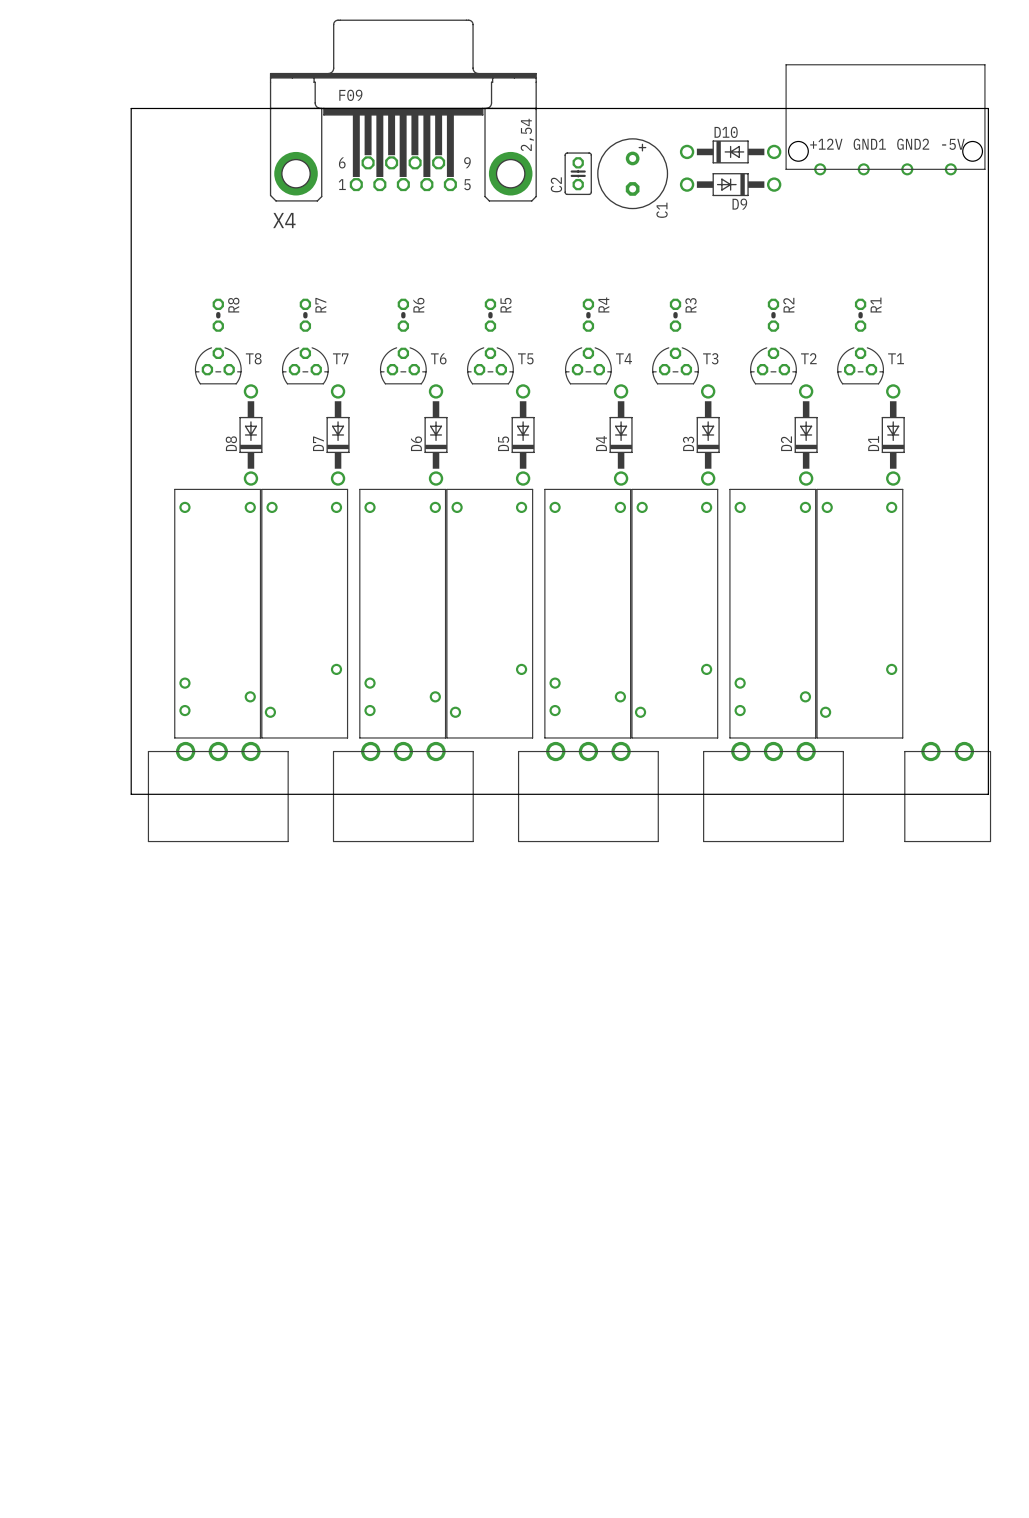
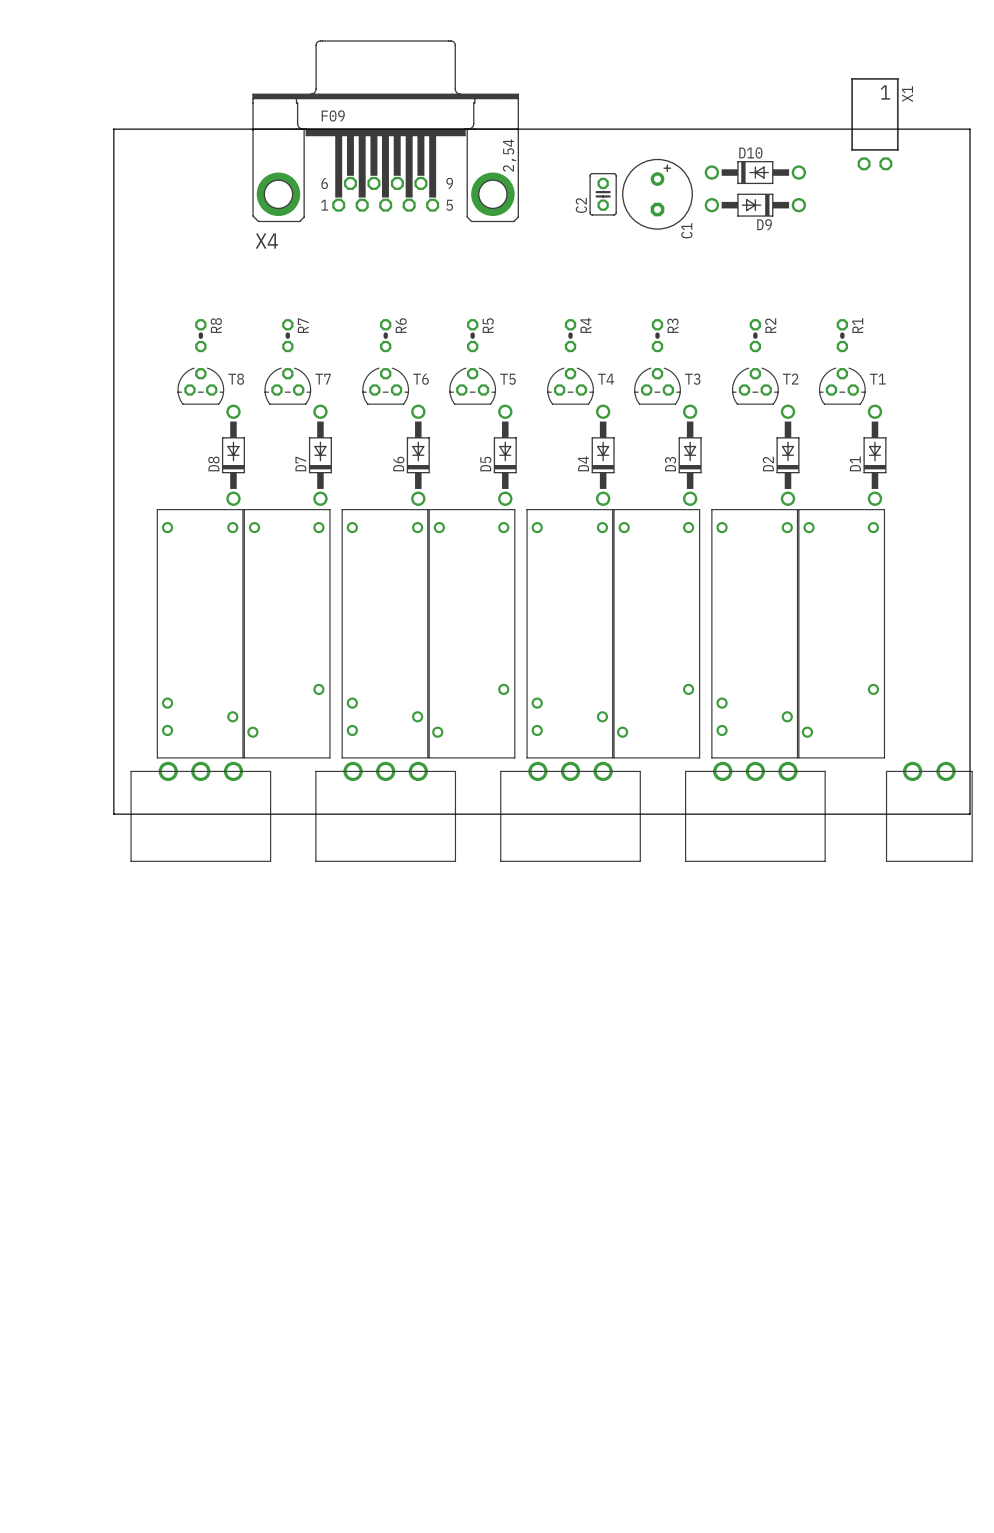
X1: none -> (874, 124)
part: (885, 119) -> none
D10 position: (730, 151) -> (755, 172)
C2 position: (578, 173) -> (603, 194)
C1 position: (632, 173) -> (657, 194)
D9 position: (730, 184) -> (755, 205)

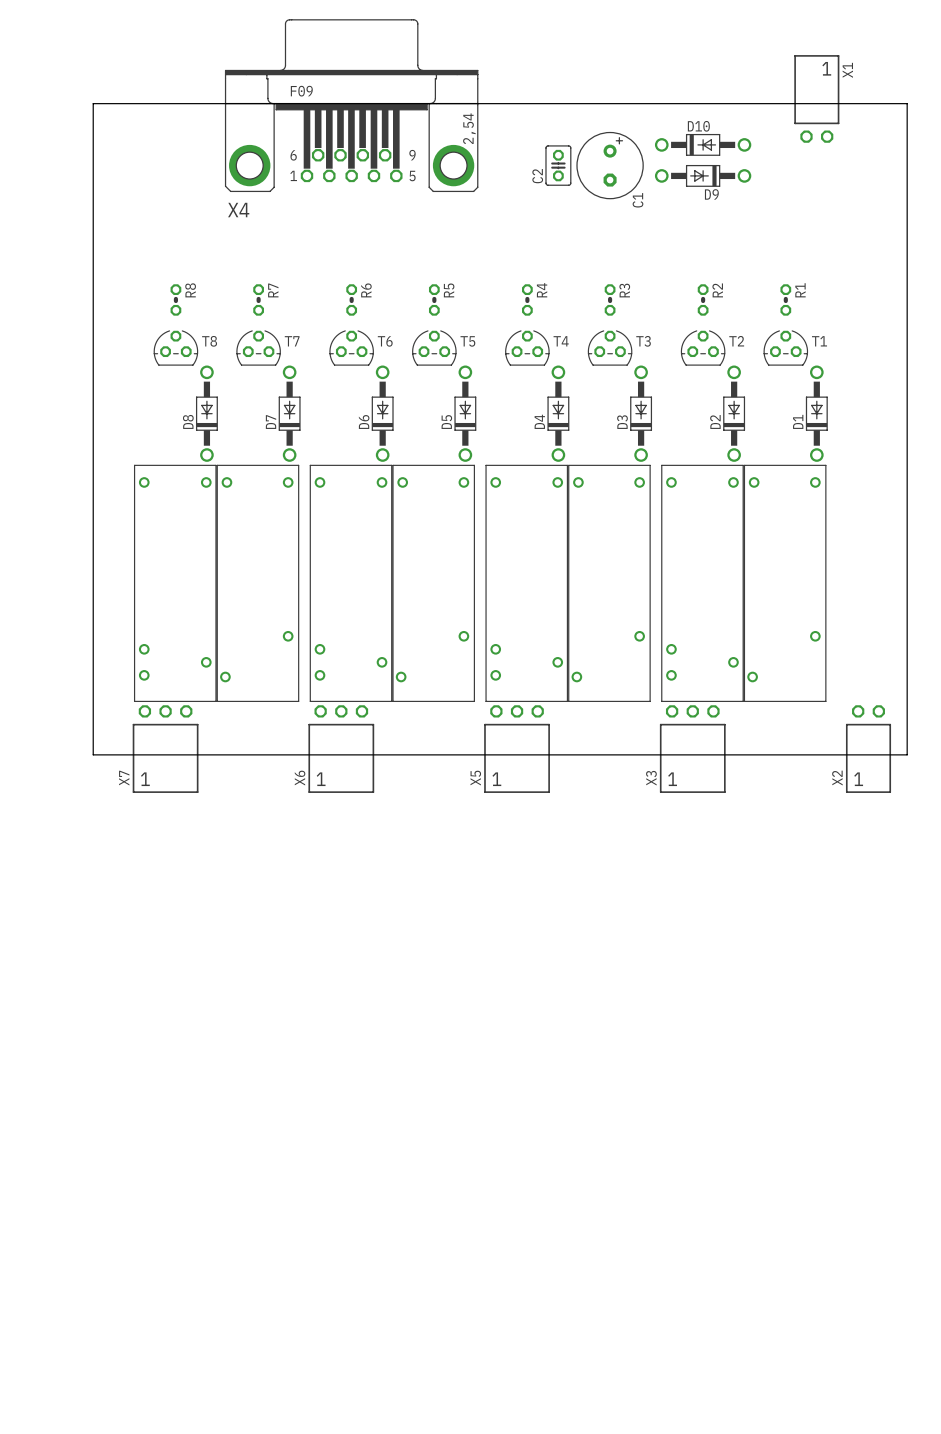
X7: none -> (165, 749)
X6: none -> (341, 749)
X5: none -> (517, 749)
X3: none -> (692, 749)
X2: none -> (868, 749)
part: (200, 811) -> none
part: (385, 811) -> none
part: (570, 811) -> none
part: (755, 811) -> none
part: (929, 811) -> none

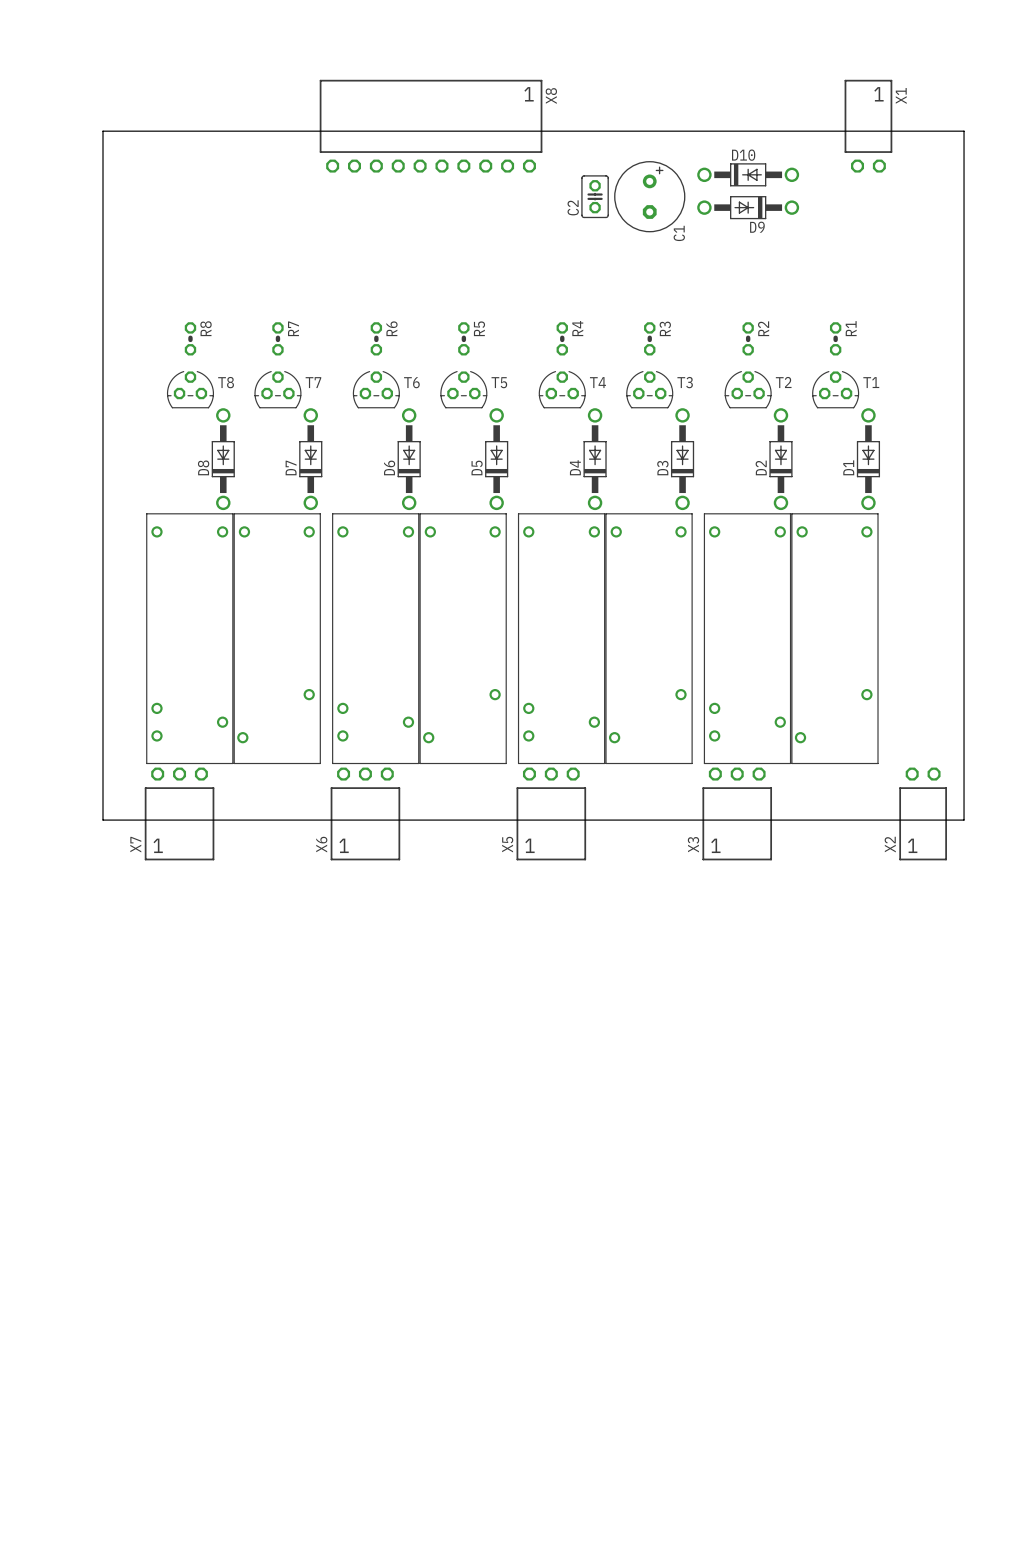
X8: none -> (431, 126)
X4: (351, 105) -> none

